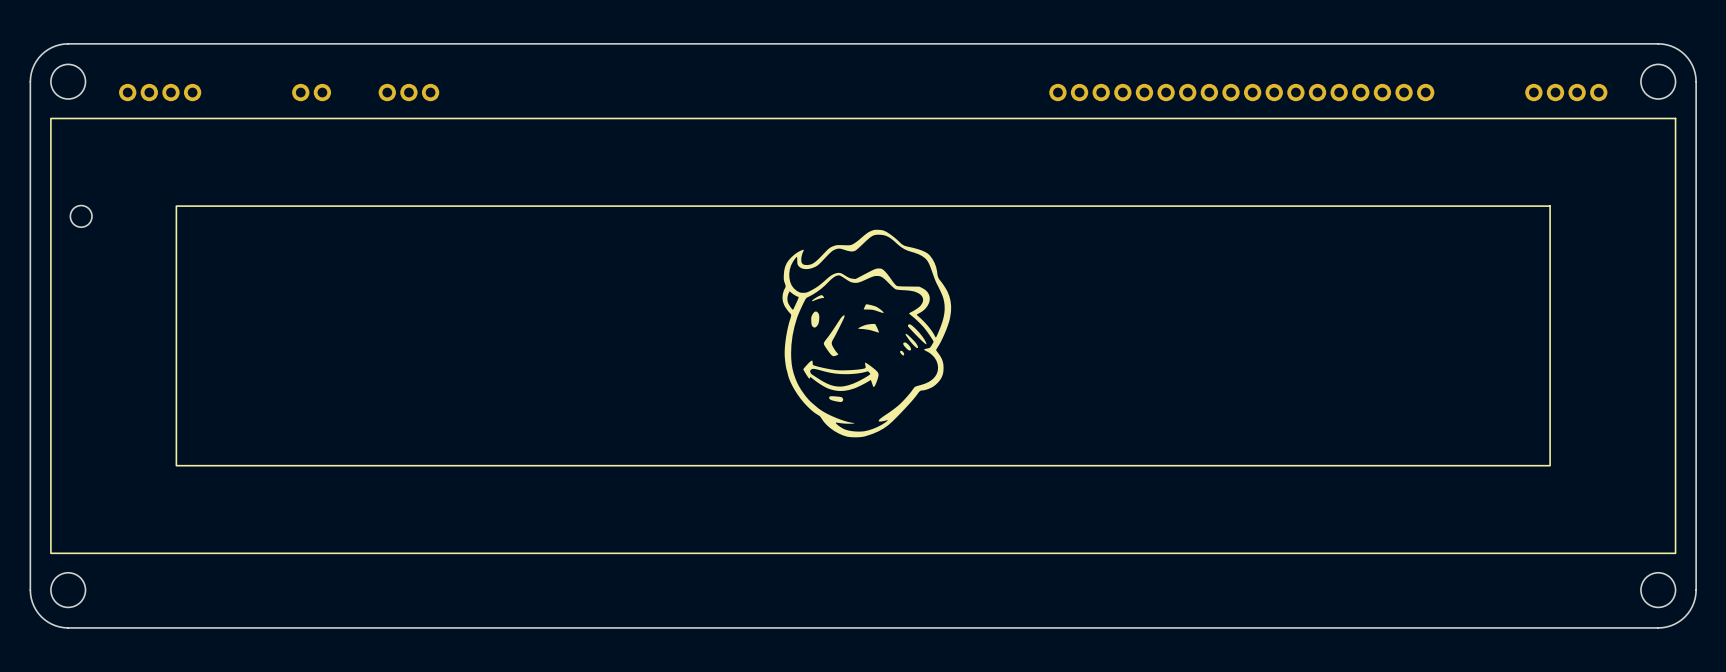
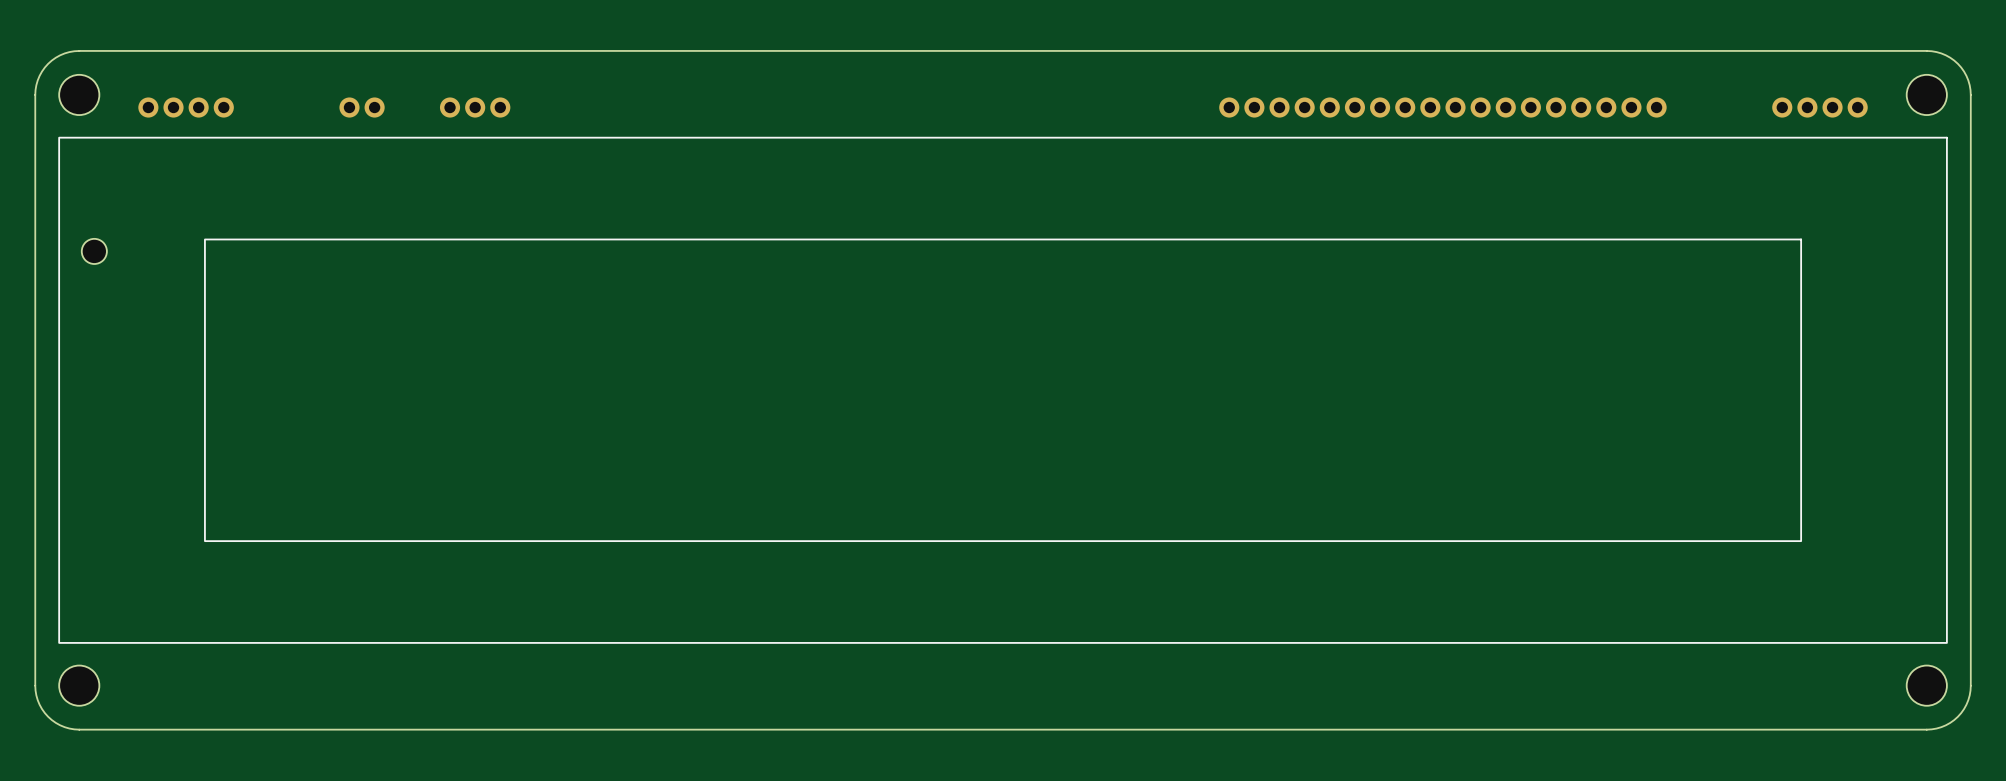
drawing: [782, 229, 952, 438] -> none

